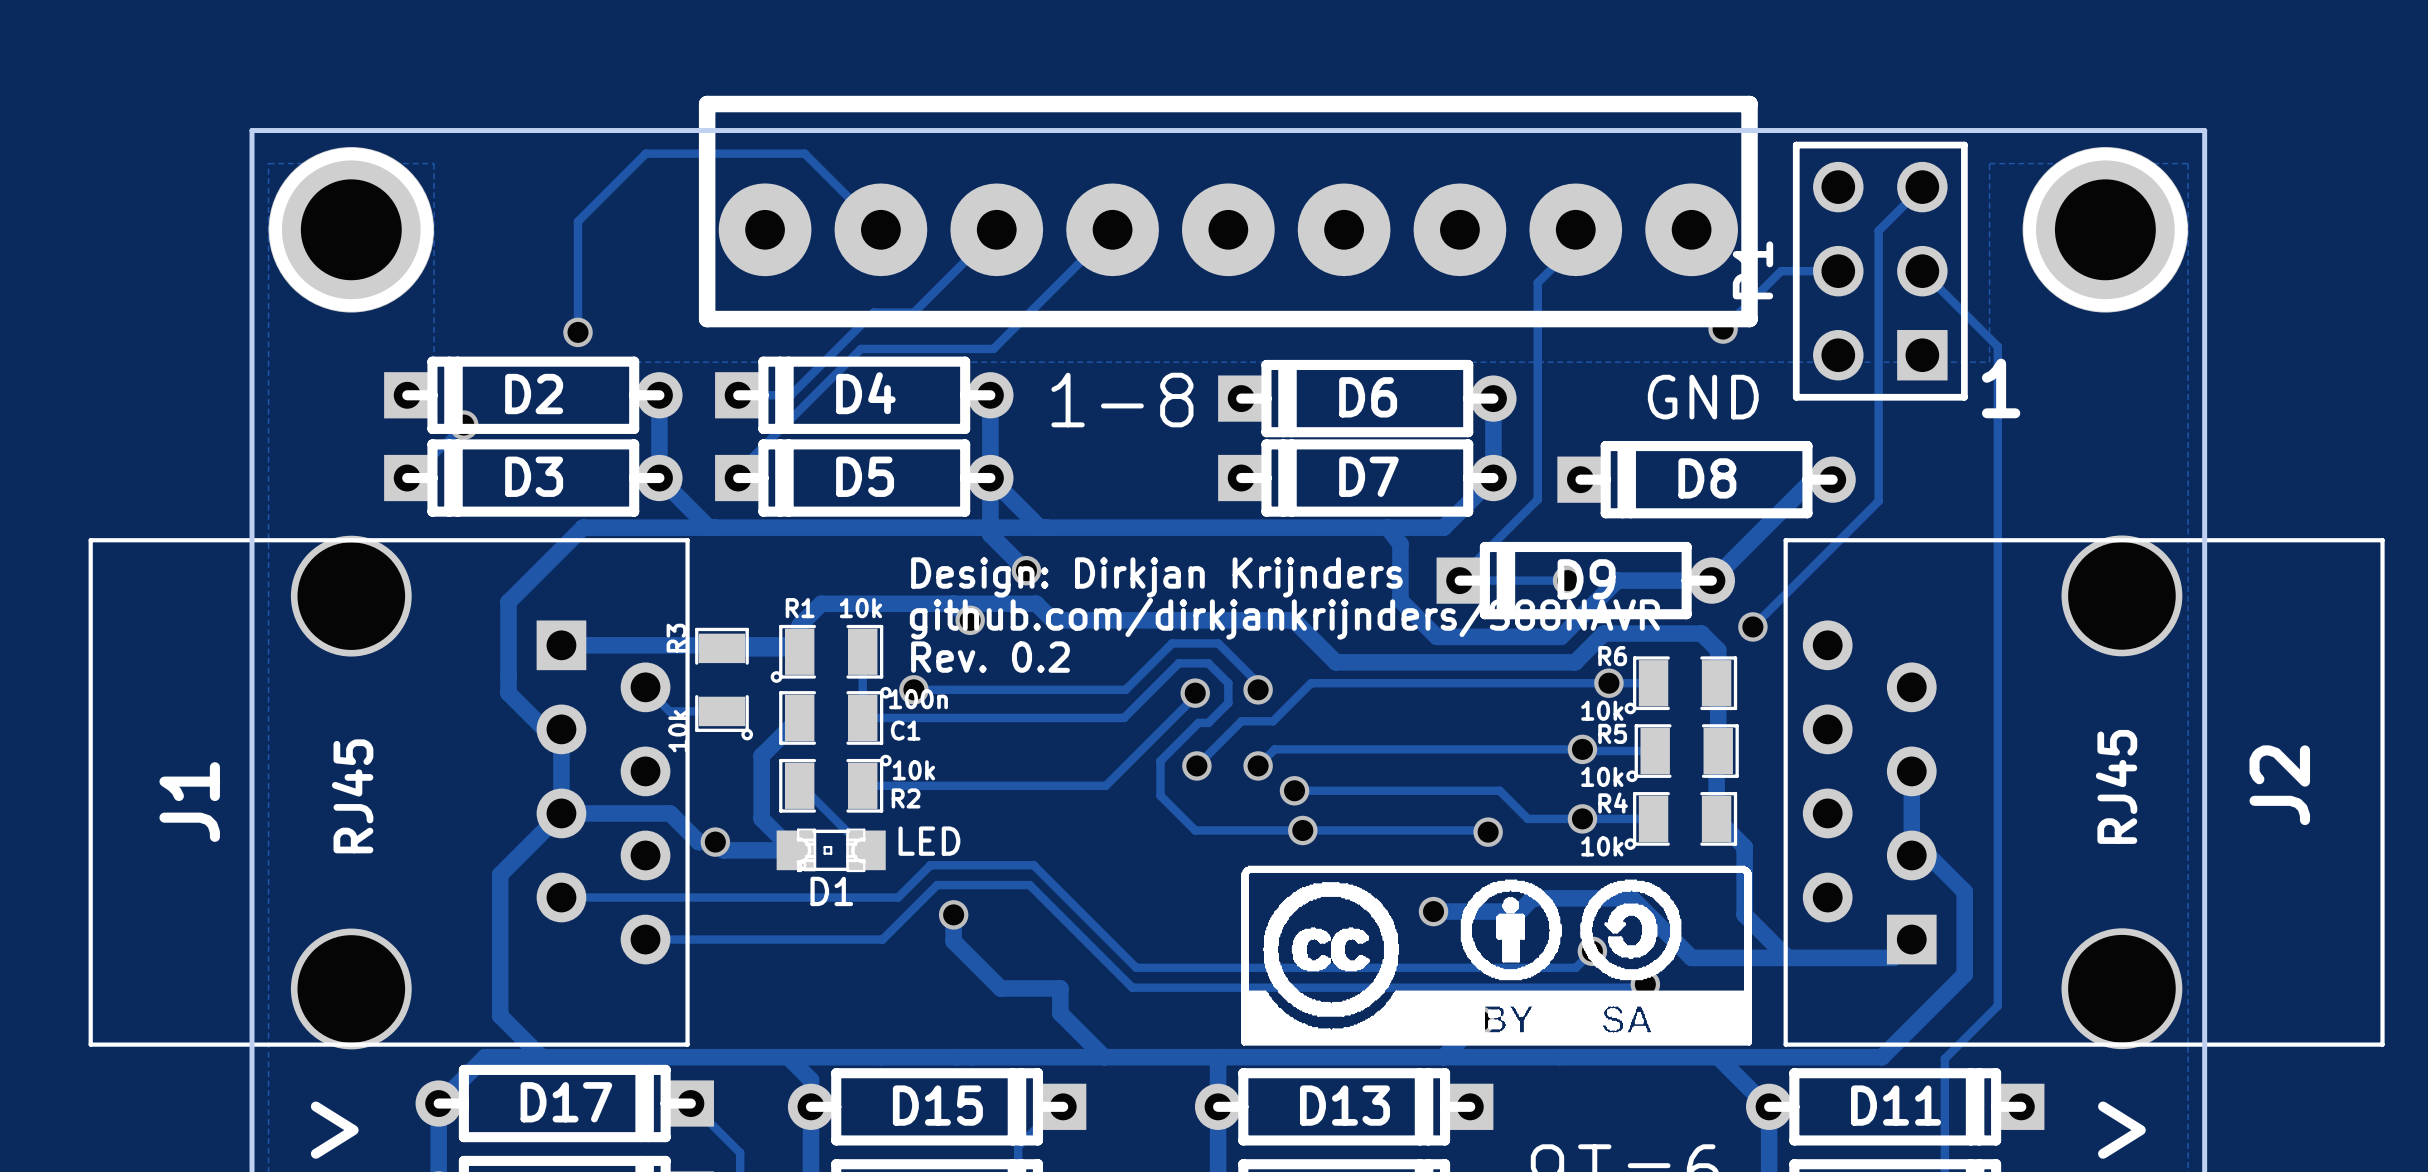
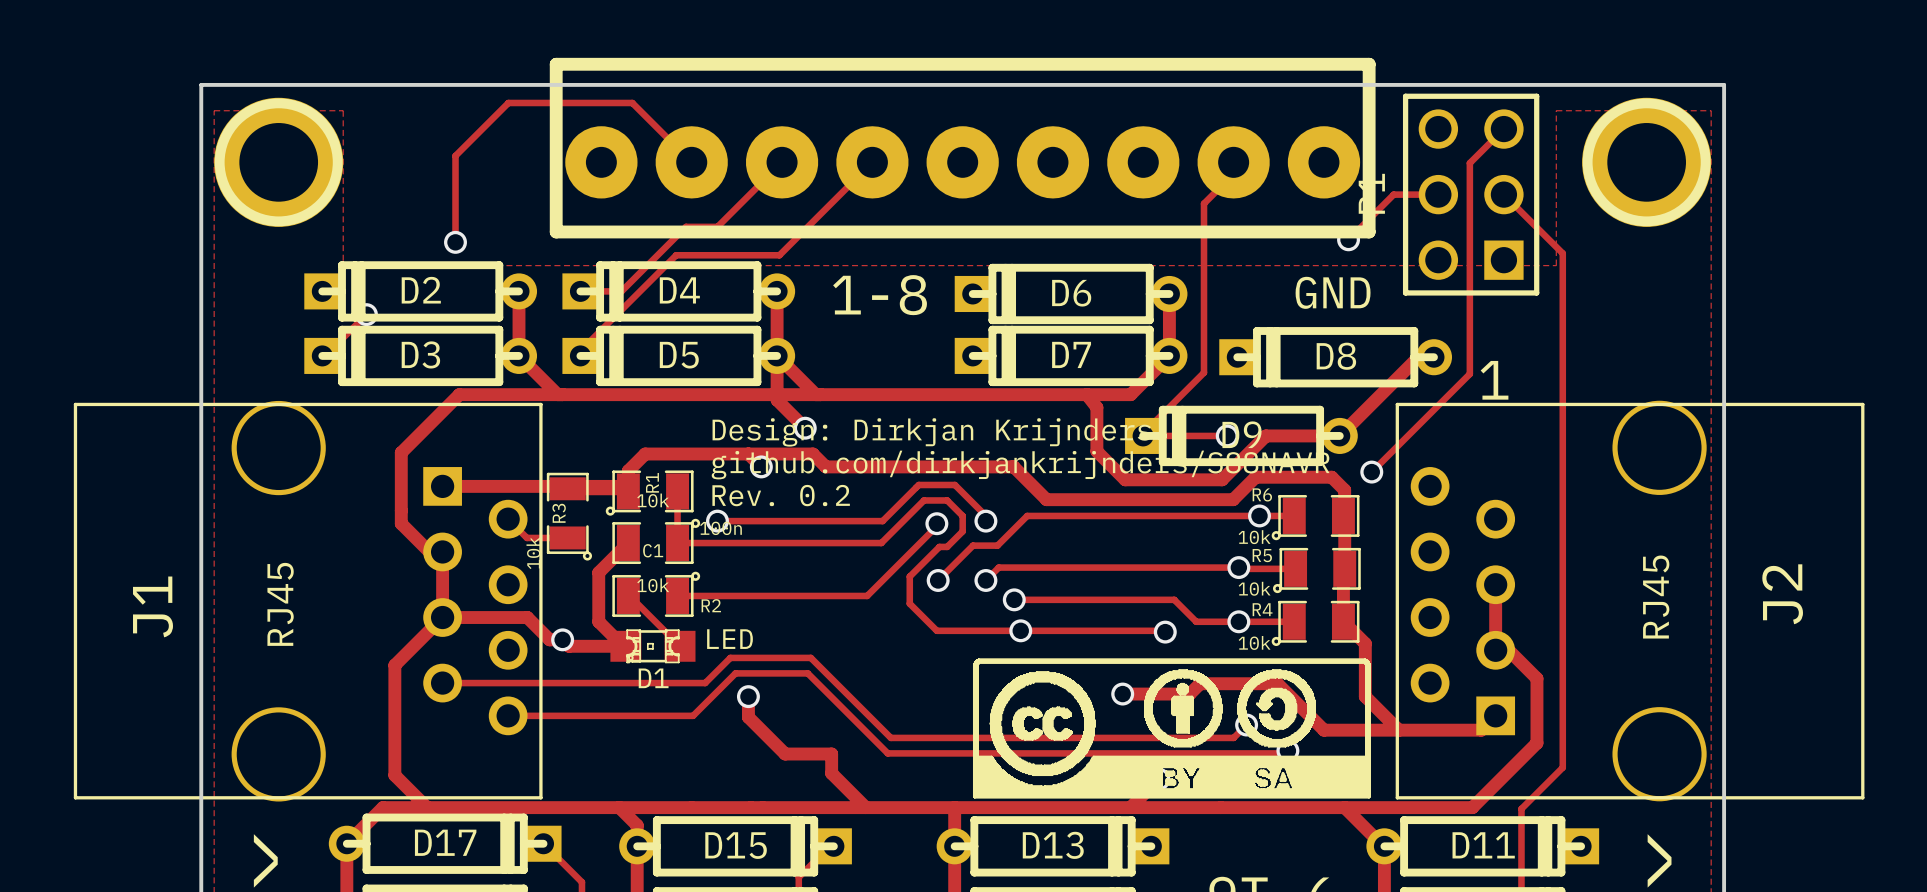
text position: 1 (2001, 388) -> 1 (1494, 380)
R1 name rotation: 0° (800, 608) -> 90° counterclockwise (652, 482)
R1 name position: R1 (800, 608) -> R1 (652, 482)
R1 value position: 10k (860, 608) -> 10k (653, 500)
R3 name position: R3 (676, 638) -> R3 (559, 513)
C1 name position: C1 (905, 730) -> C1 (653, 550)
R2 value position: 10k (913, 770) -> 10k (653, 585)

